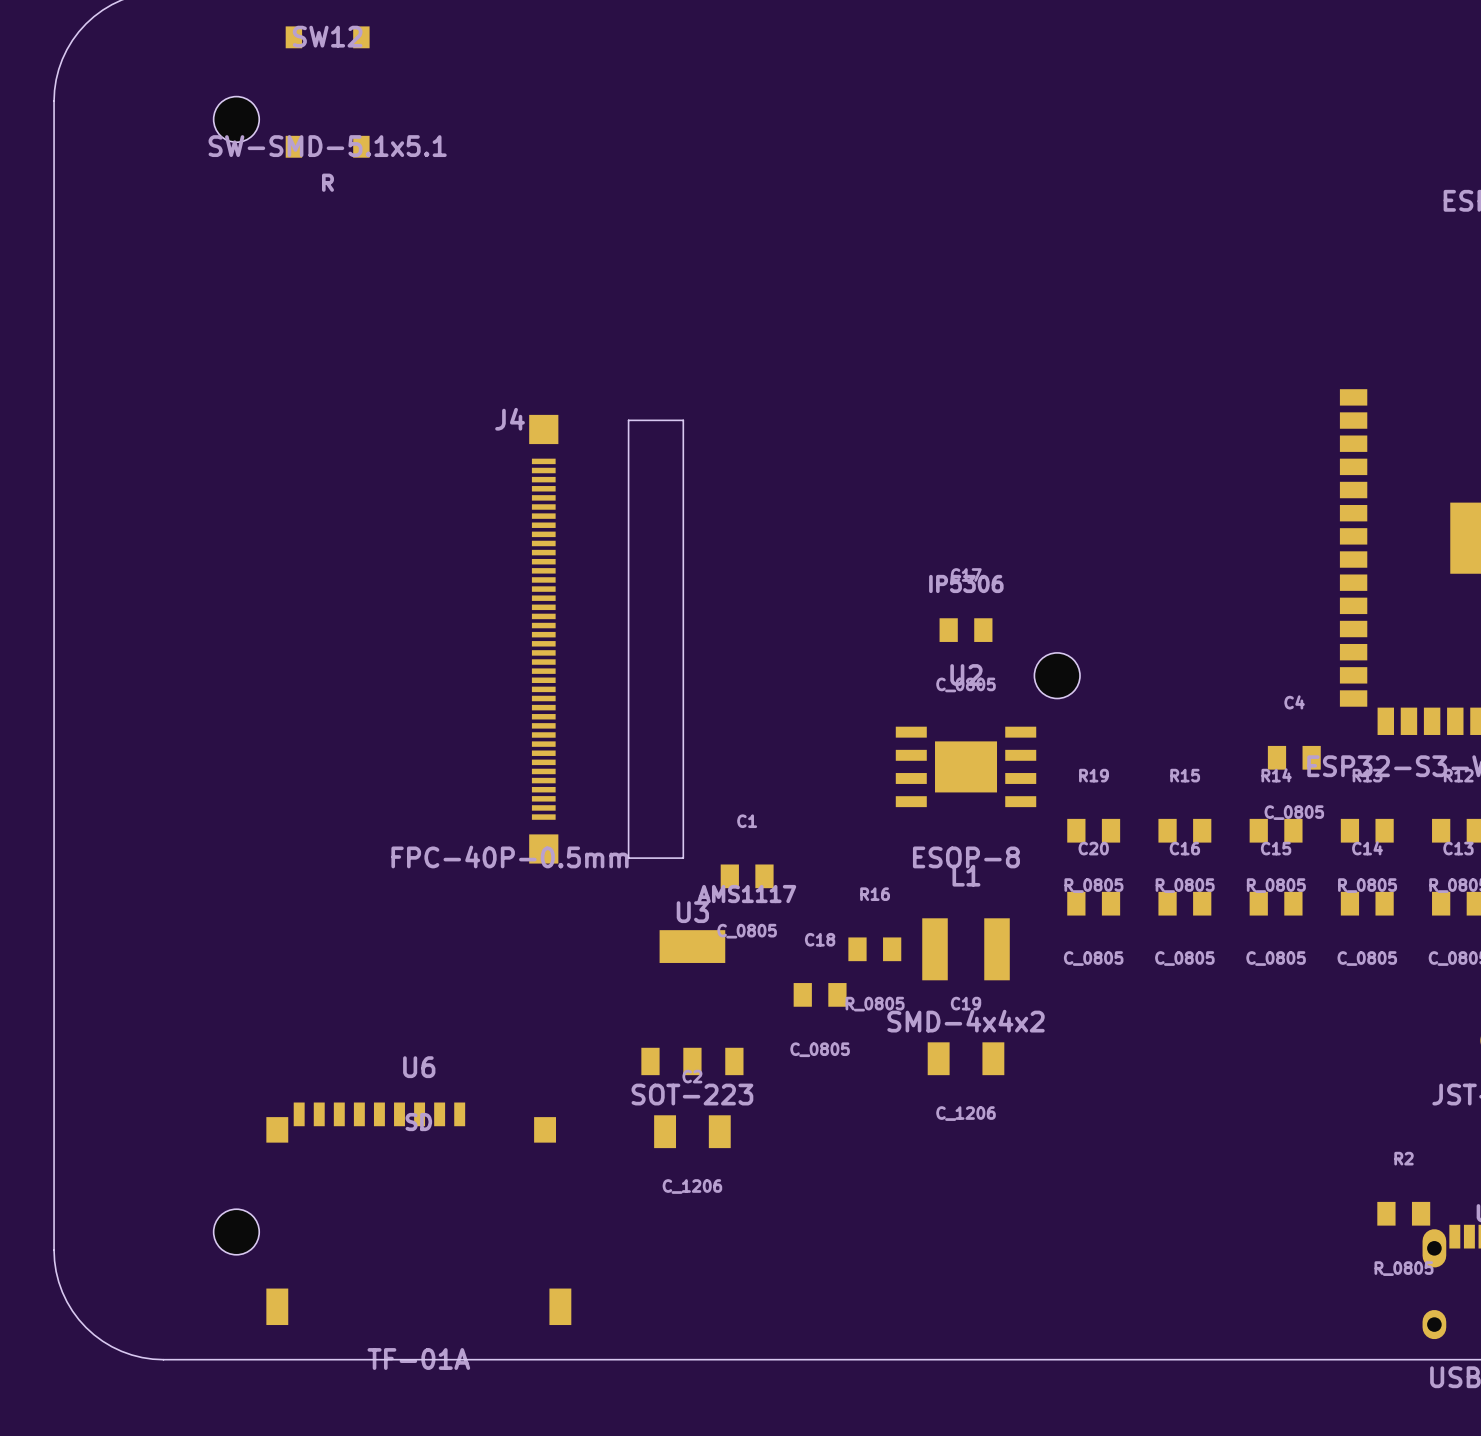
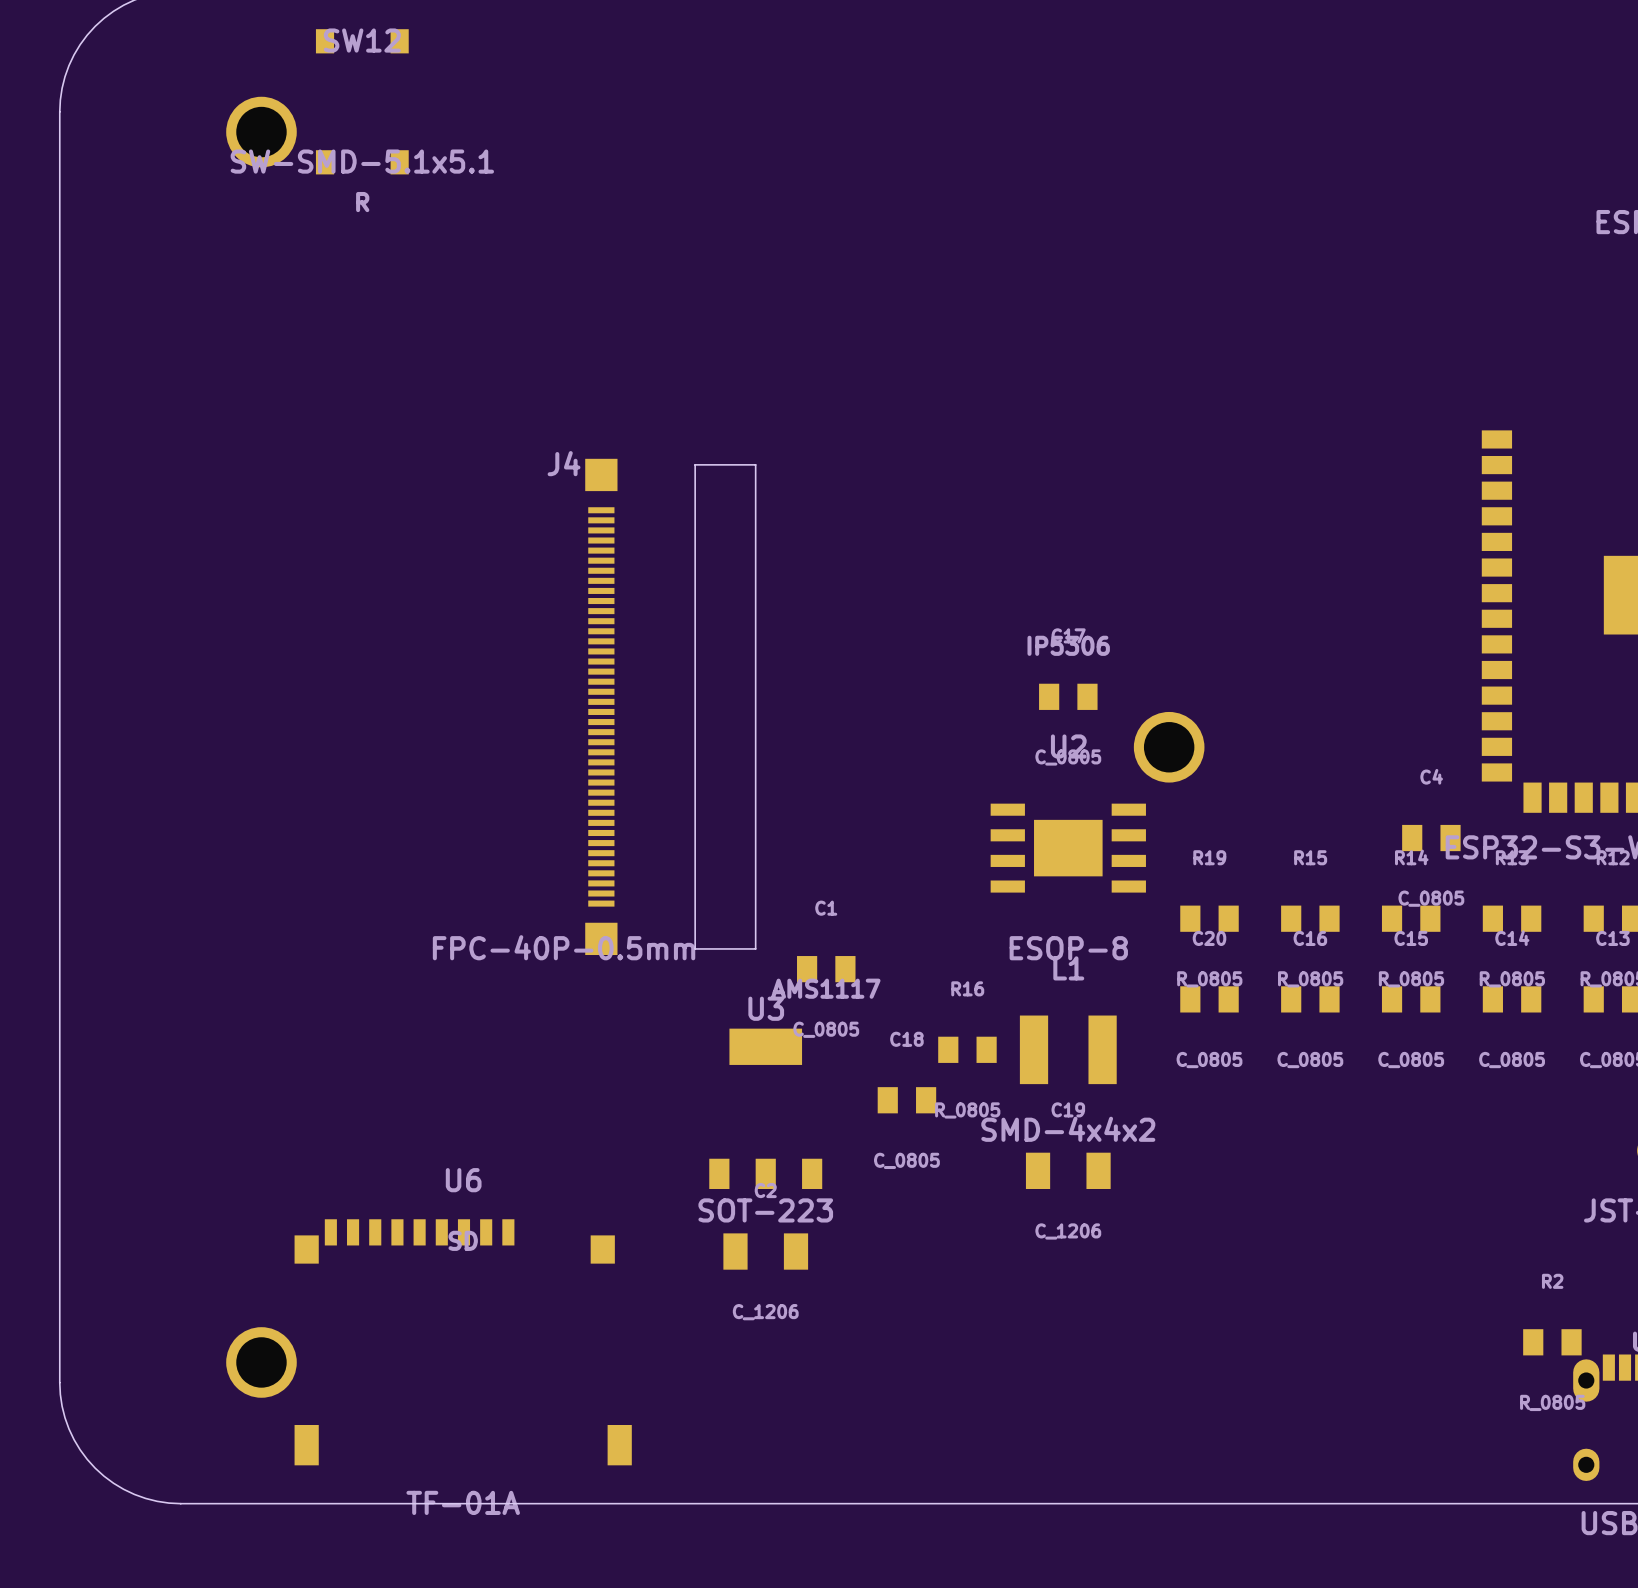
part footprint: [213, 96, 260, 143] -> [226, 96, 297, 168]
part footprint: [1034, 652, 1081, 699] -> [1133, 711, 1205, 783]
part footprint: [213, 1209, 260, 1255] -> [226, 1327, 297, 1398]

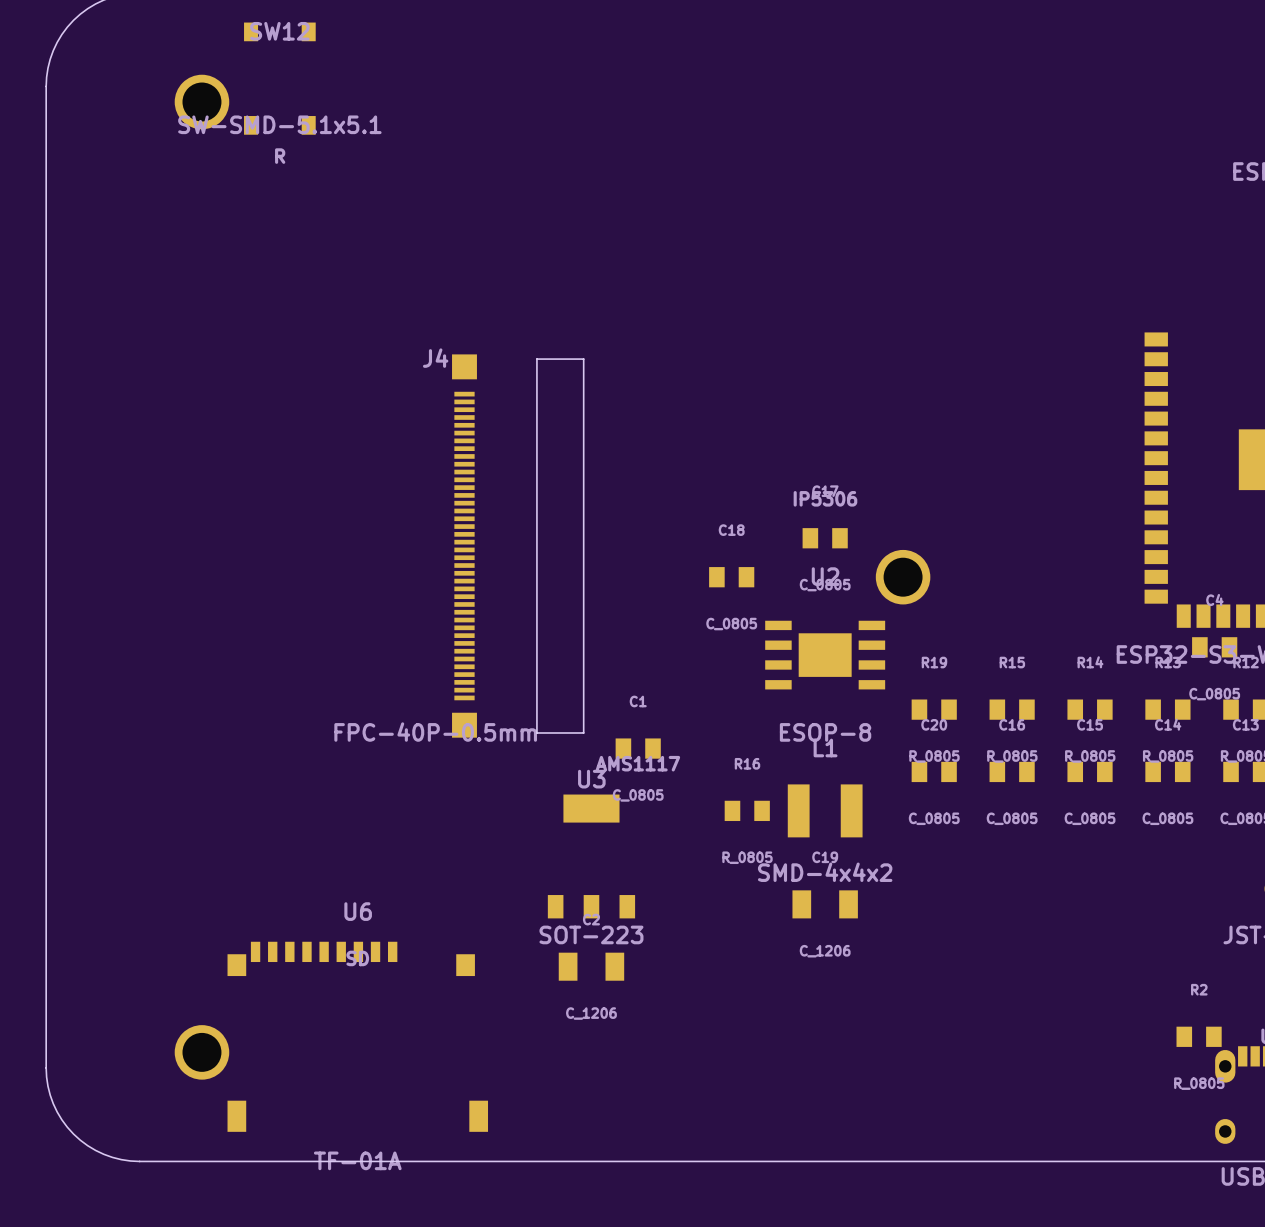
C4 position: (1431, 838) -> (1214, 647)
C18 position: (906, 1100) -> (731, 577)

